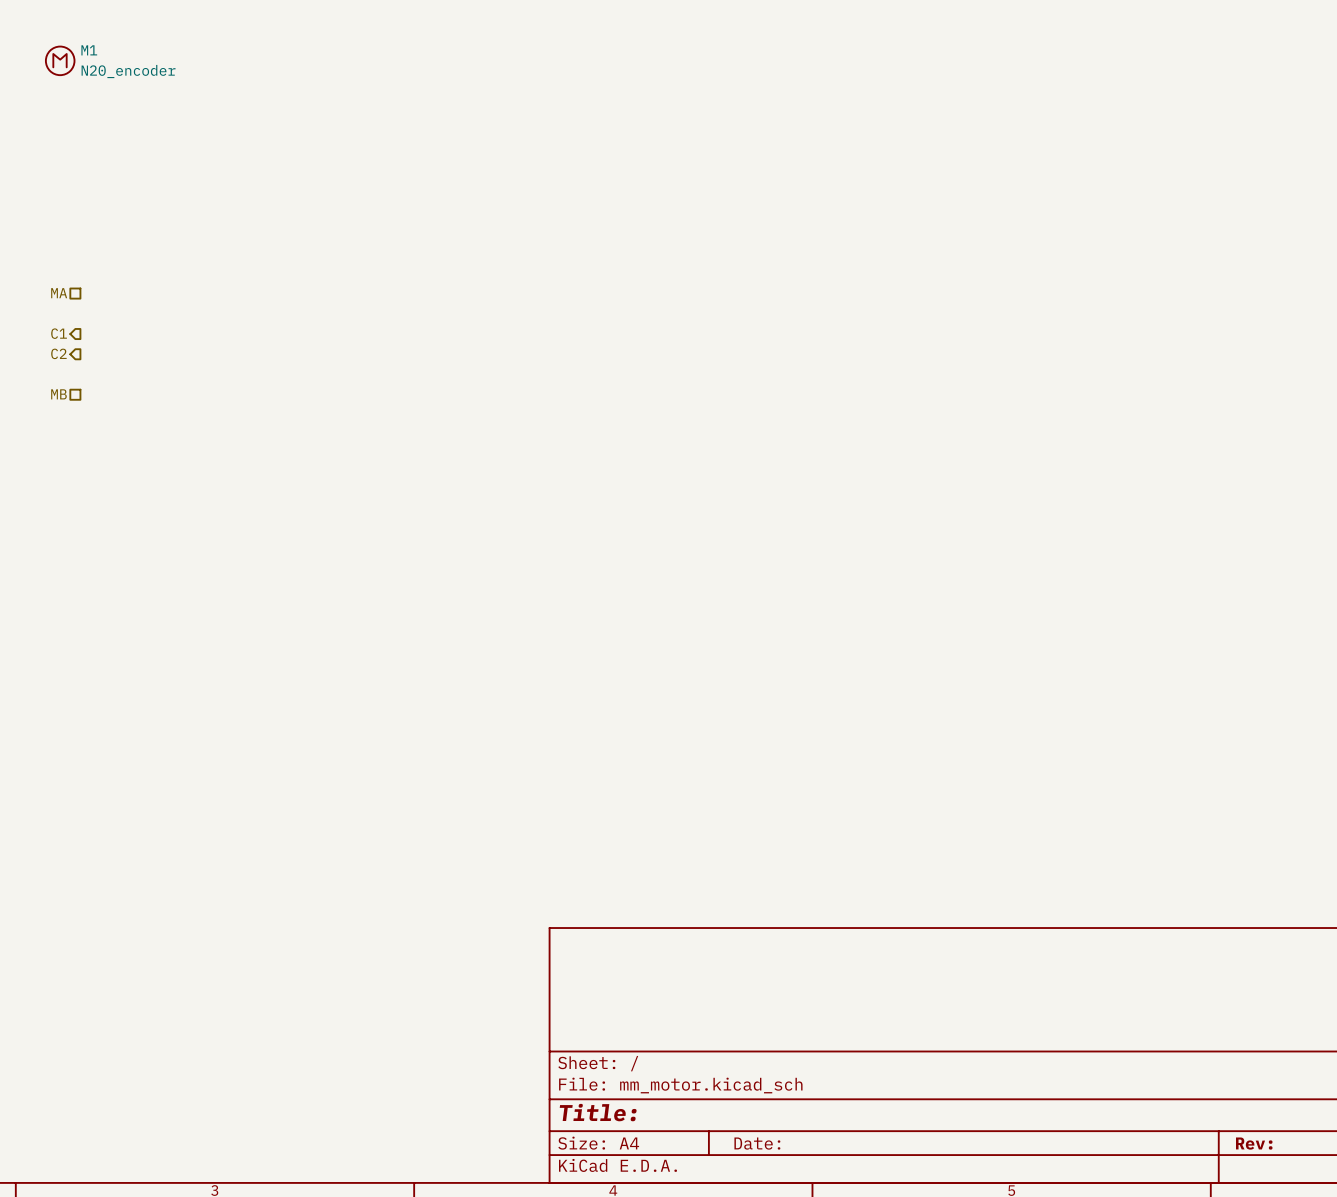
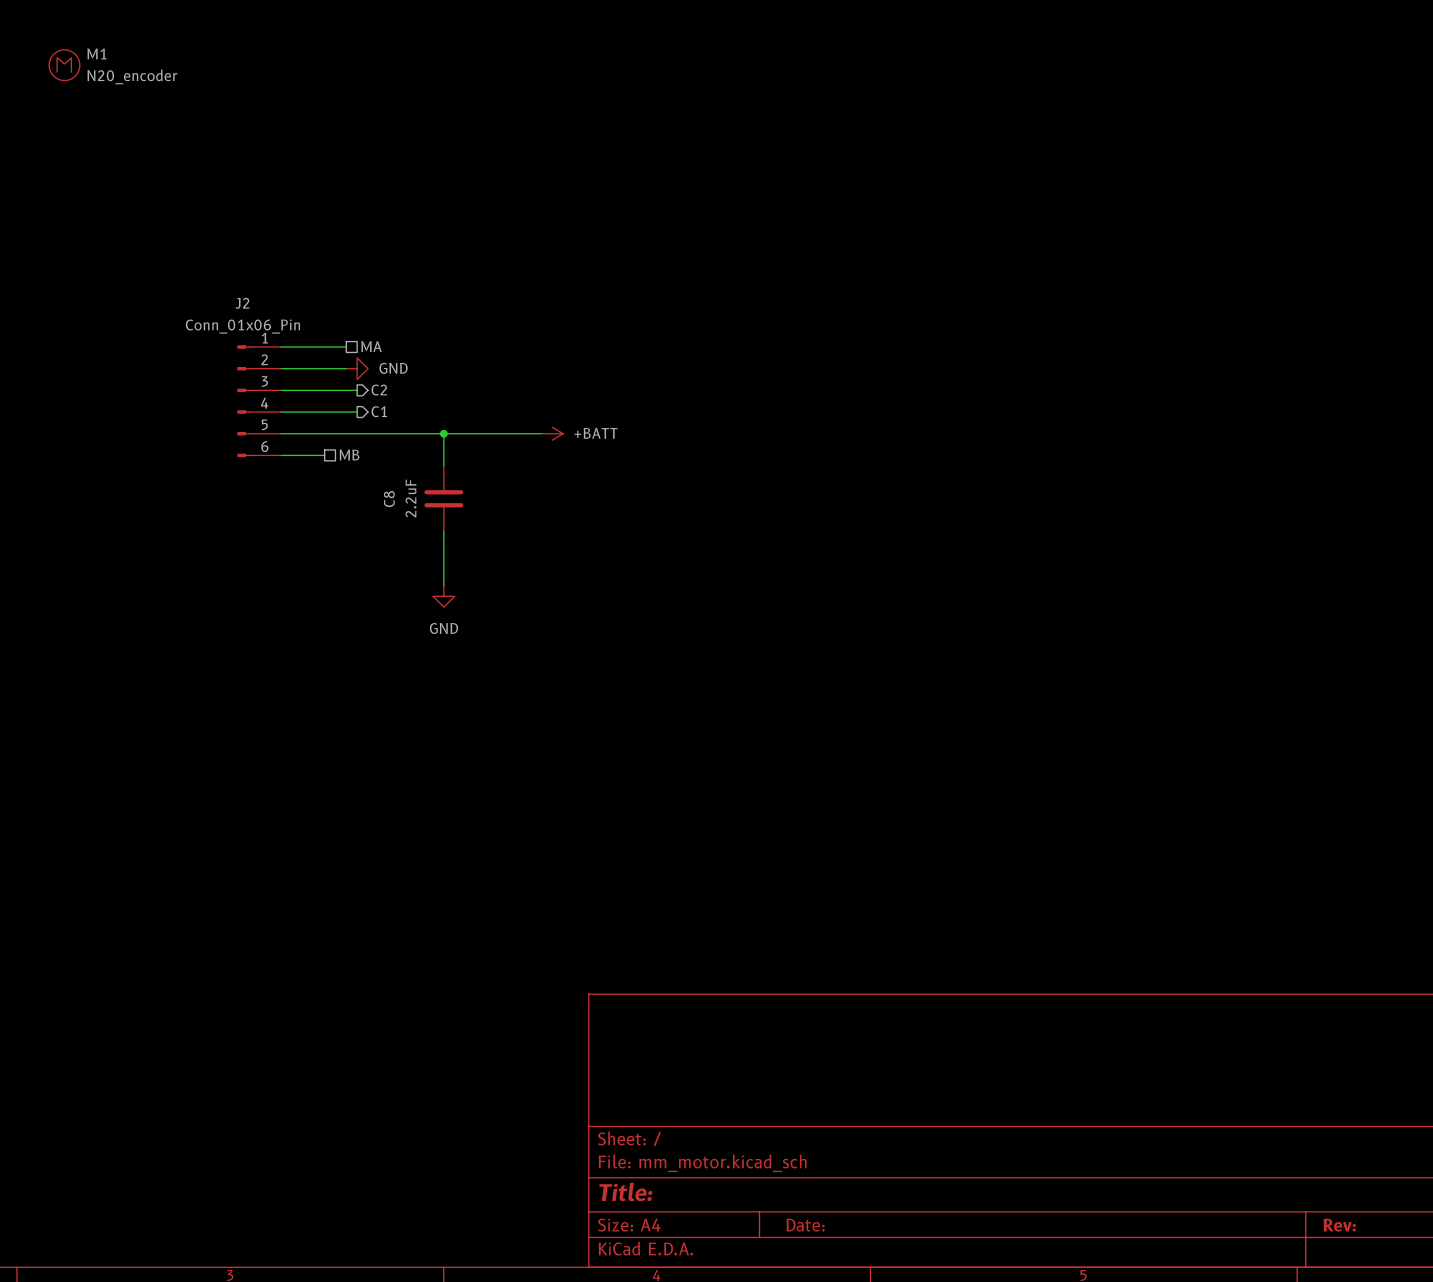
hierarchical label: MA (59, 293) -> none
wire: none -> (281, 347) (346, 347)
hierarchical label: none -> MA (371, 346)
hierarchical label: C1 (59, 333) -> none
wire: none -> (281, 368) (346, 368)
power symbol: none -> GND (357, 368)
hierarchical label: C2 (58, 353) -> none
wire: none -> (281, 390) (357, 390)
hierarchical label: none -> C2 (379, 390)
J2: none -> Conn_01x06_Pin (259, 401)
wire: none -> (281, 412) (357, 412)
hierarchical label: none -> C1 (379, 411)
hierarchical label: MB (58, 394) -> none
wire: none -> (281, 433) (541, 433)
wire: none -> (443, 433) (443, 466)
junction: none -> (443, 433)
power symbol: none -> +BATT (552, 433)
hierarchical label: none -> MB (349, 455)
wire: none -> (281, 455) (324, 455)
C8: none -> 2.2uF (443, 498)
wire: none -> (443, 531) (443, 585)
power symbol: none -> GND (443, 596)

